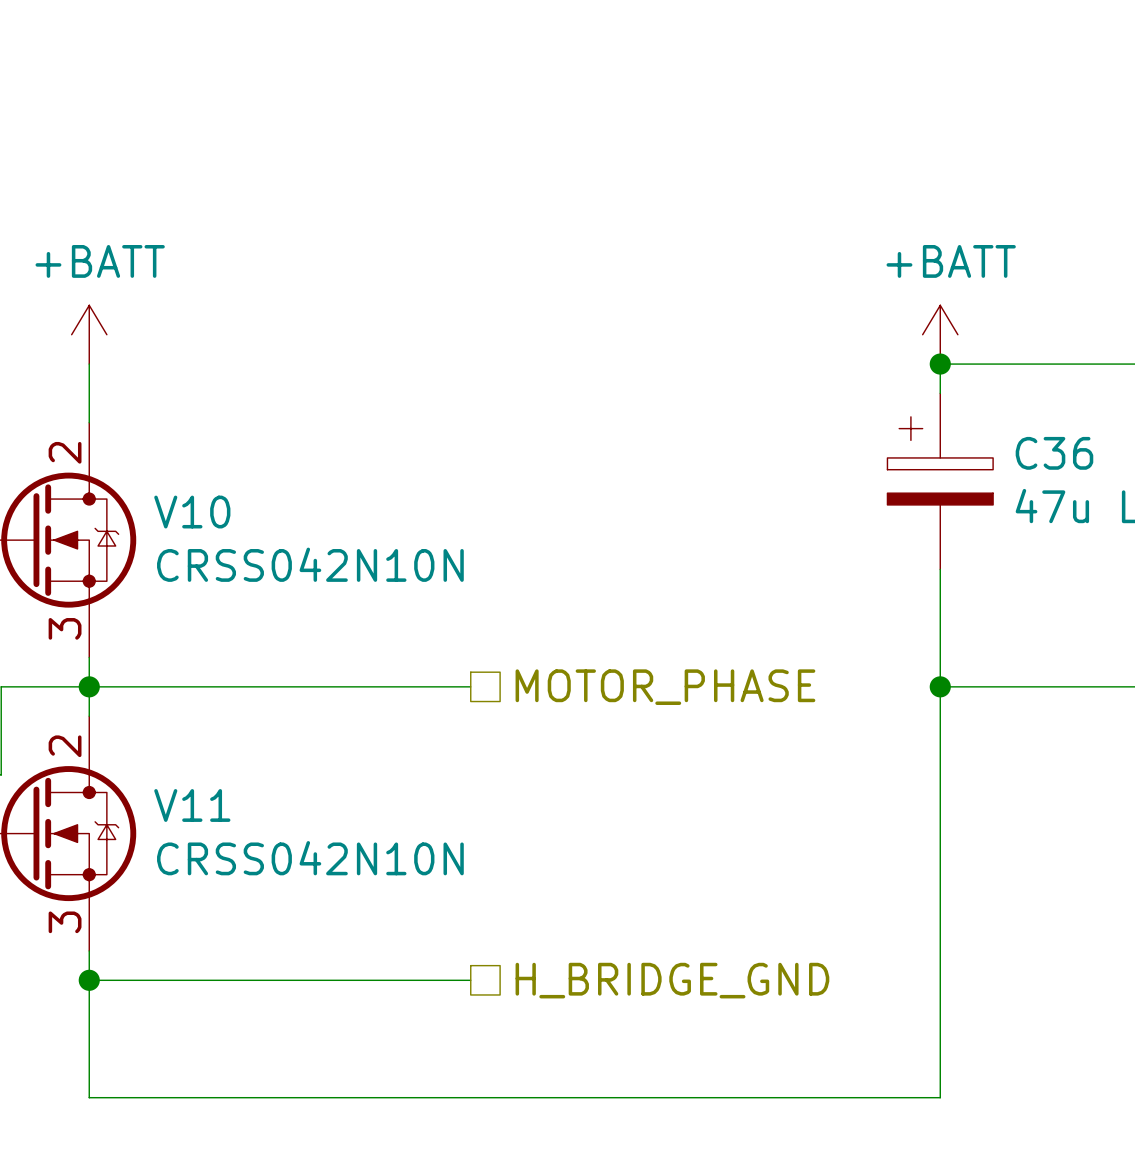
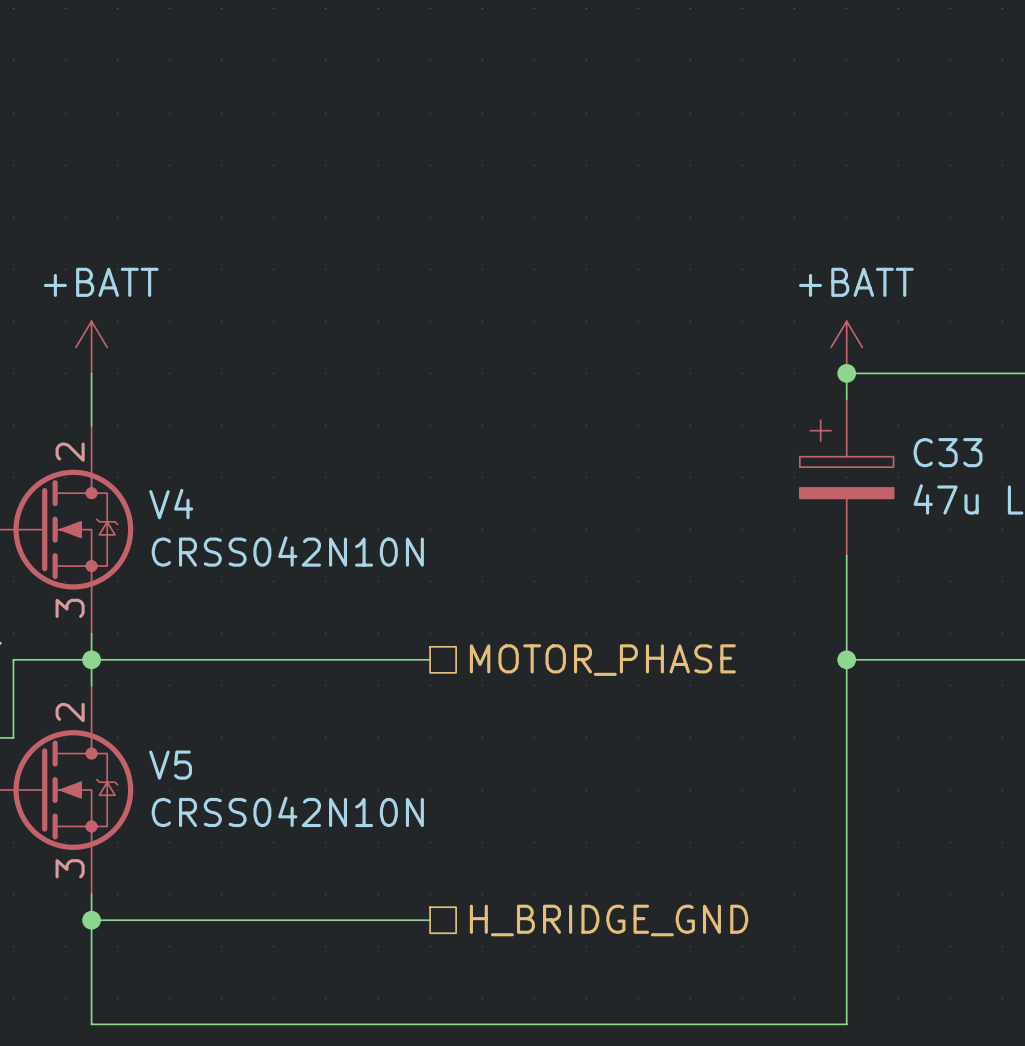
C36 name: C36 (1054, 453) -> C33 (948, 452)
V10 name: V10 (192, 512) -> V4 (171, 504)
V11 name: V11 (192, 805) -> V5 (170, 765)

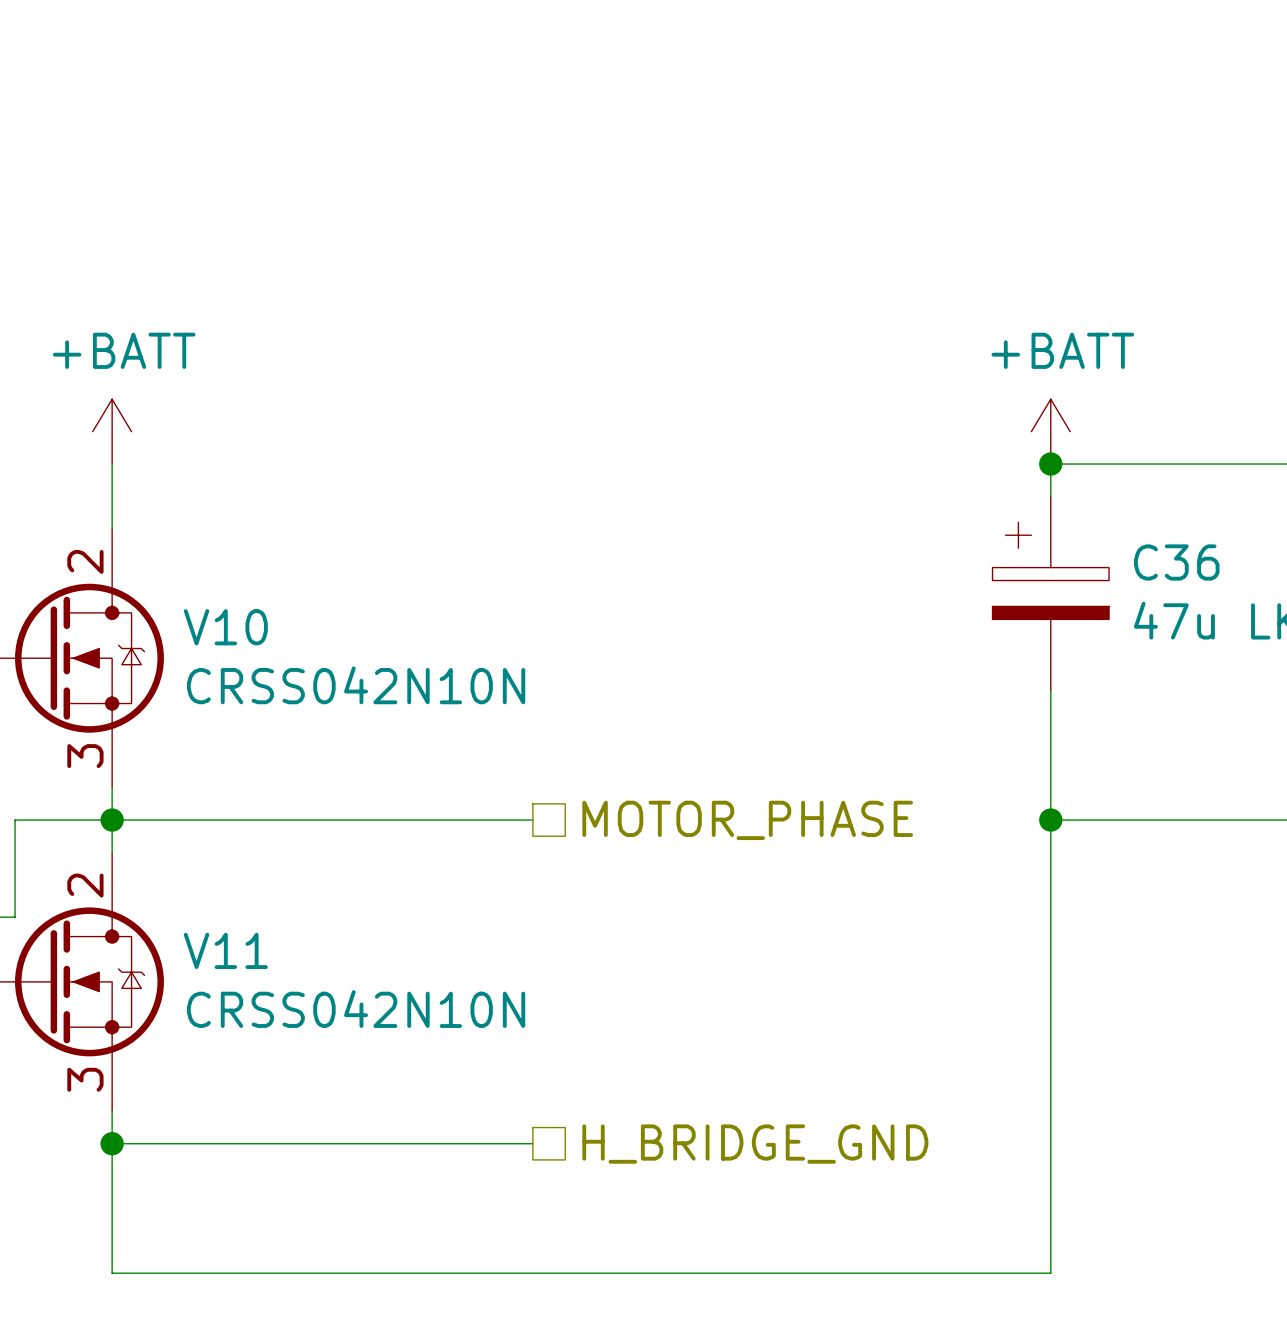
C33 name: C33 (948, 452) -> C36 (1176, 562)
V4 name: V4 (171, 504) -> V10 (225, 627)
V5 name: V5 (170, 765) -> V11 (225, 950)

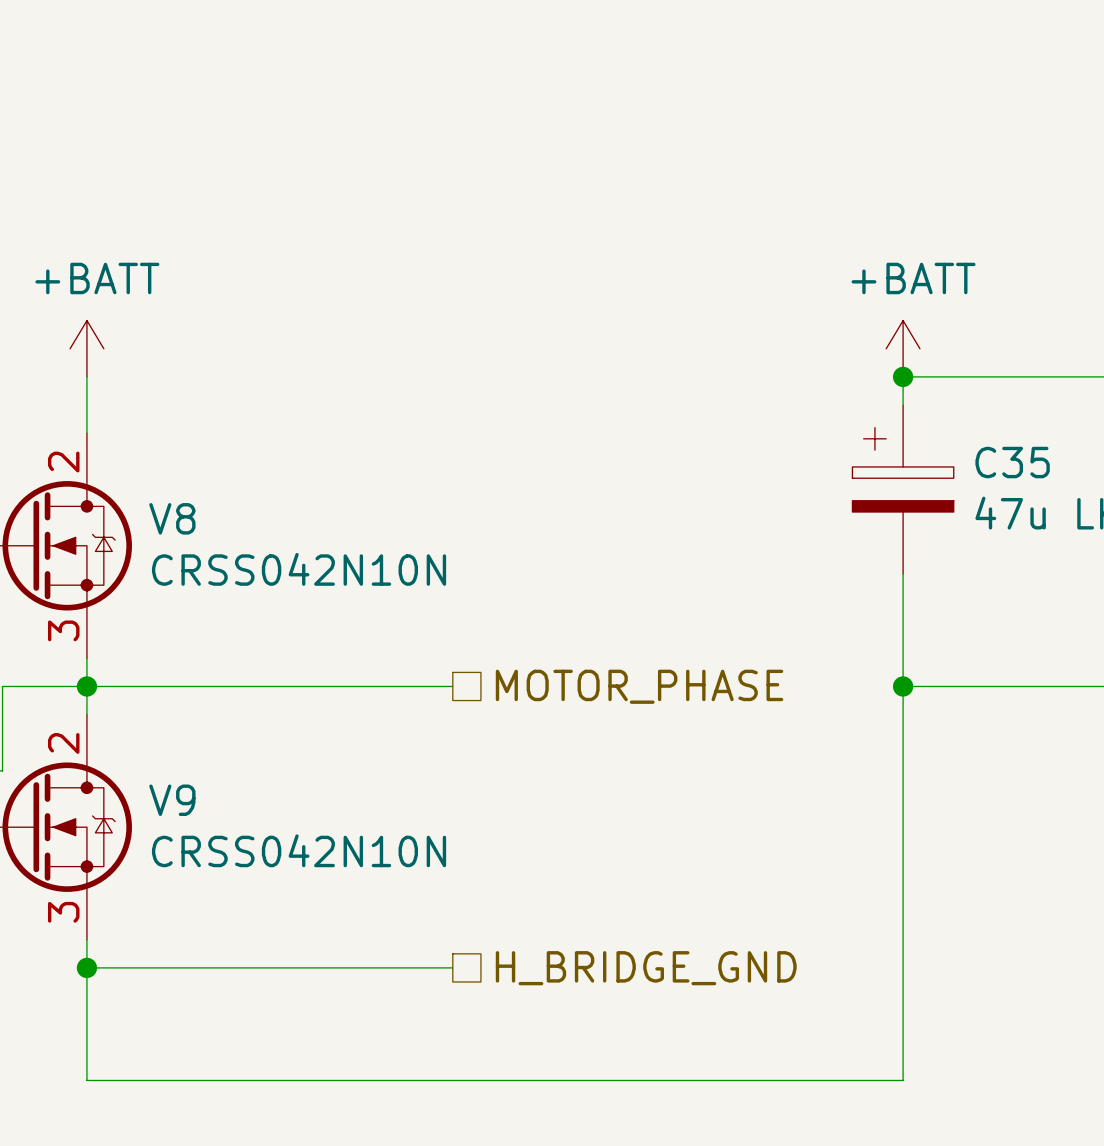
C36 name: C36 (1176, 562) -> C35 (1012, 462)
V10 name: V10 (225, 627) -> V8 (172, 518)
V11 name: V11 (225, 950) -> V9 (172, 800)

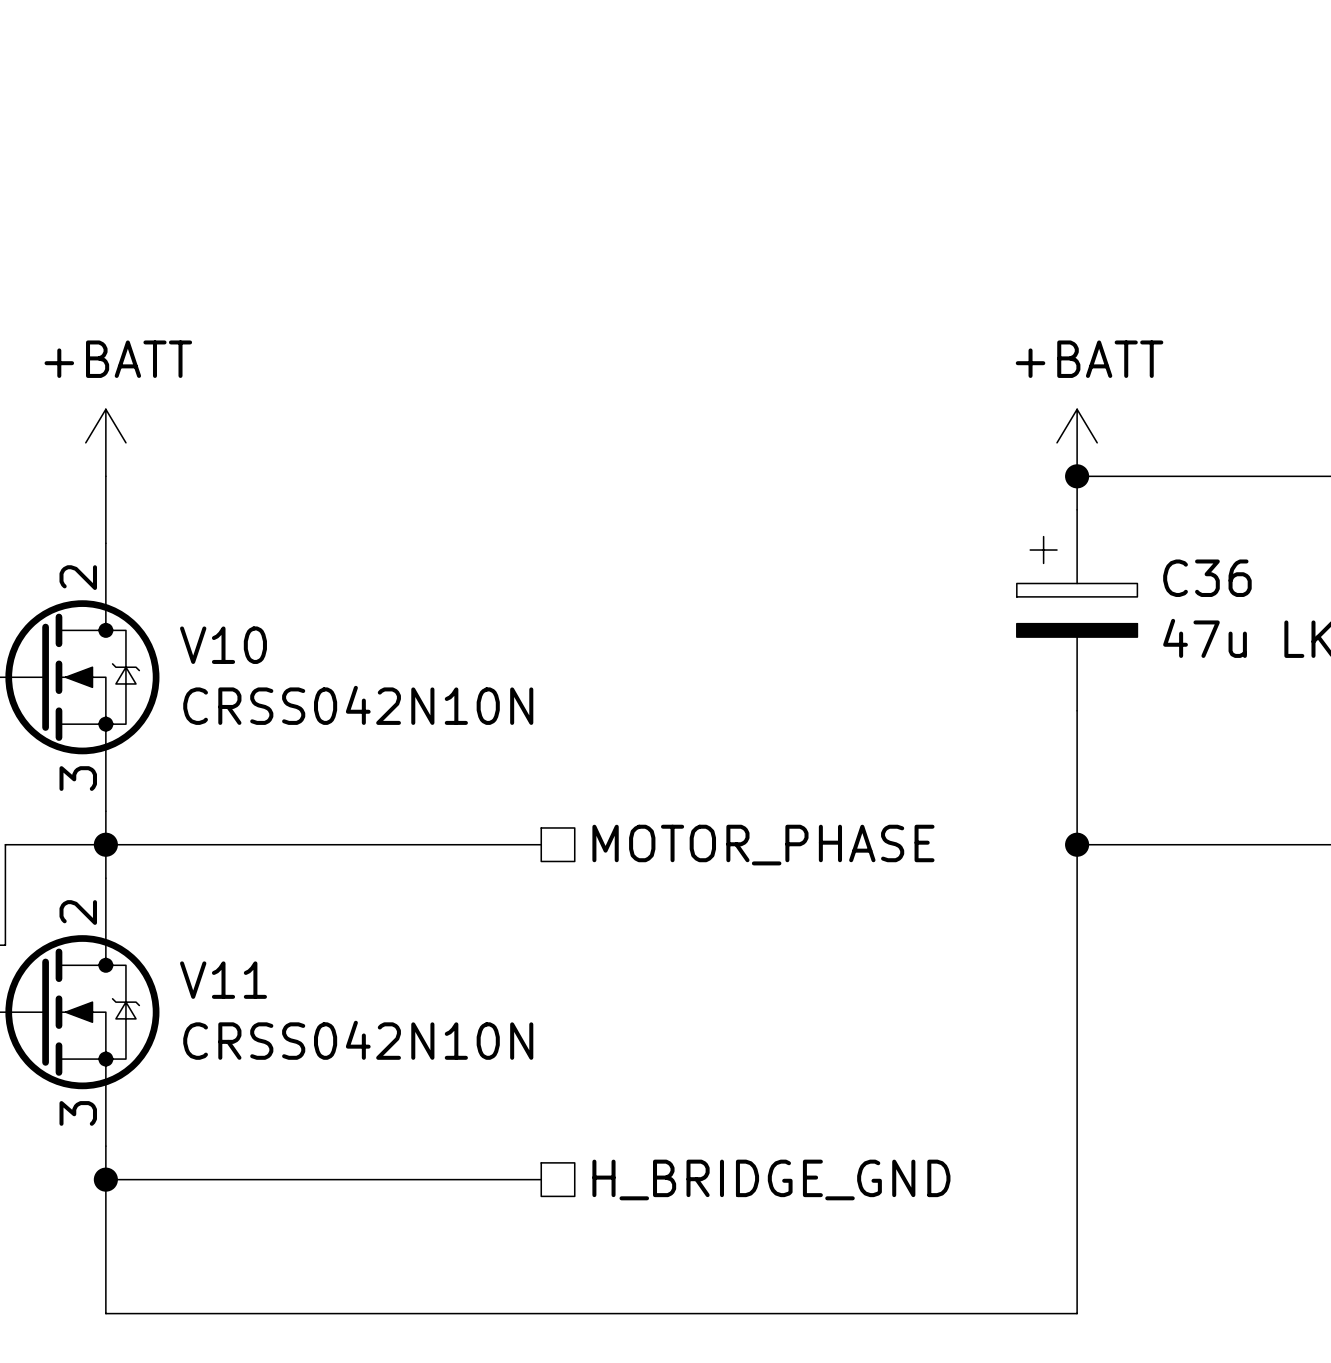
C35 name: C35 (1012, 462) -> C36 (1207, 578)
V8 name: V8 (172, 518) -> V10 (223, 645)
V9 name: V9 (172, 800) -> V11 (223, 980)

